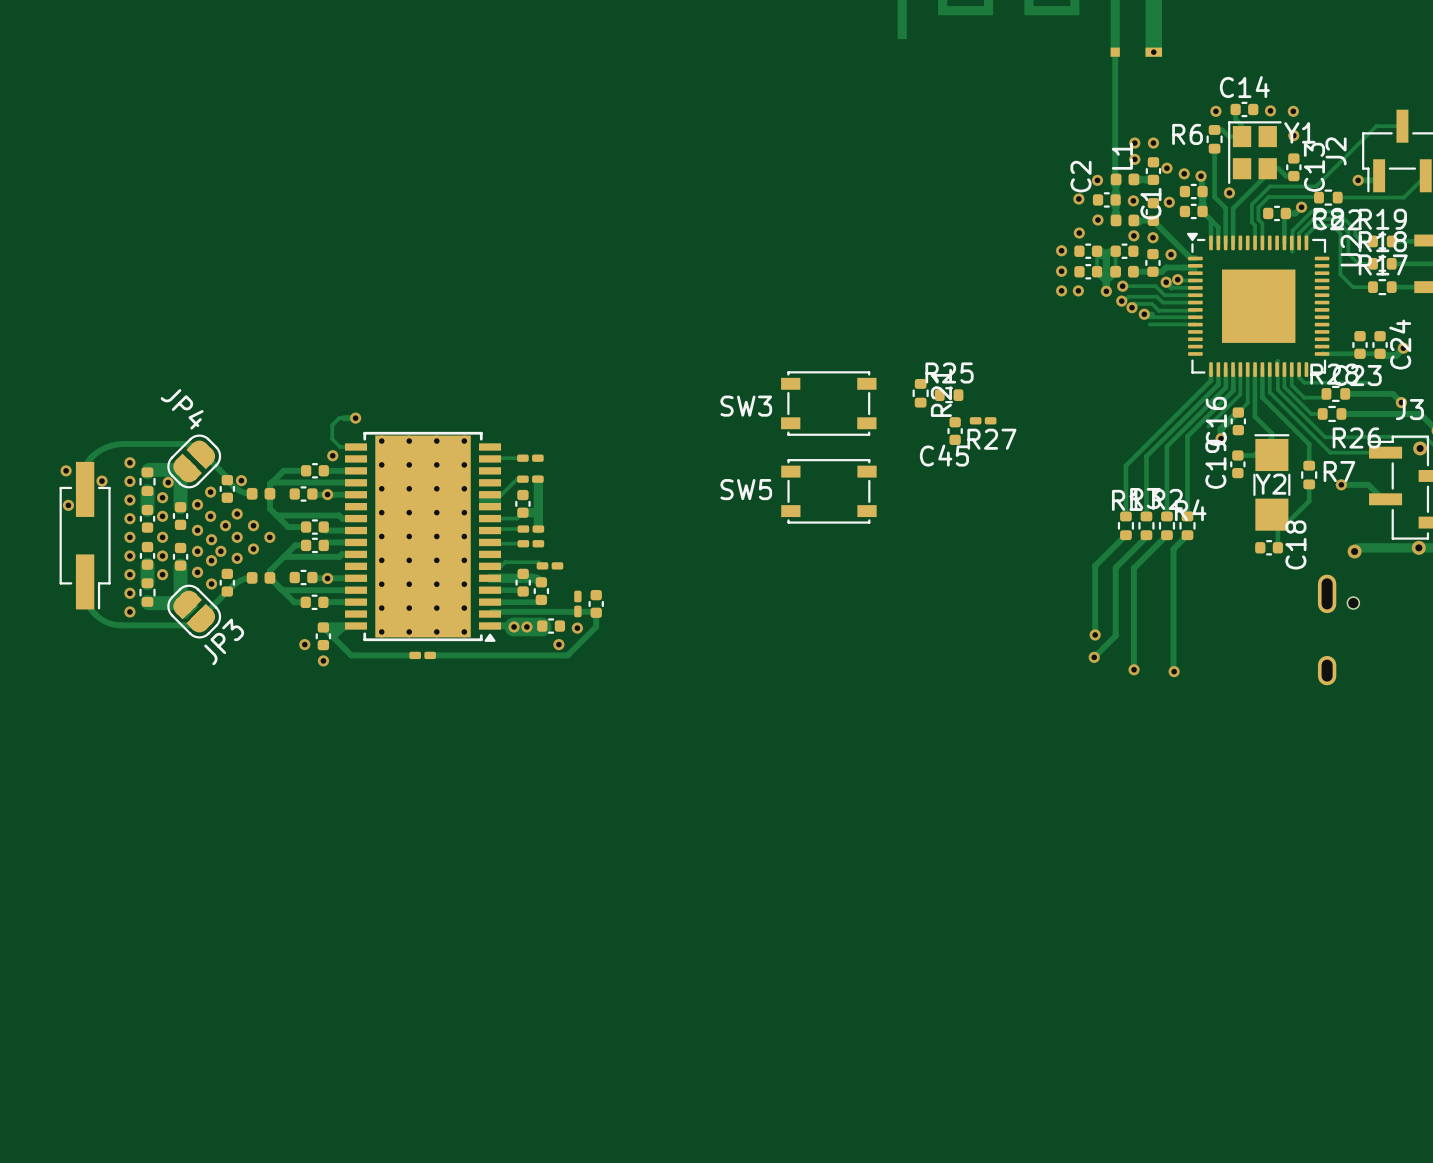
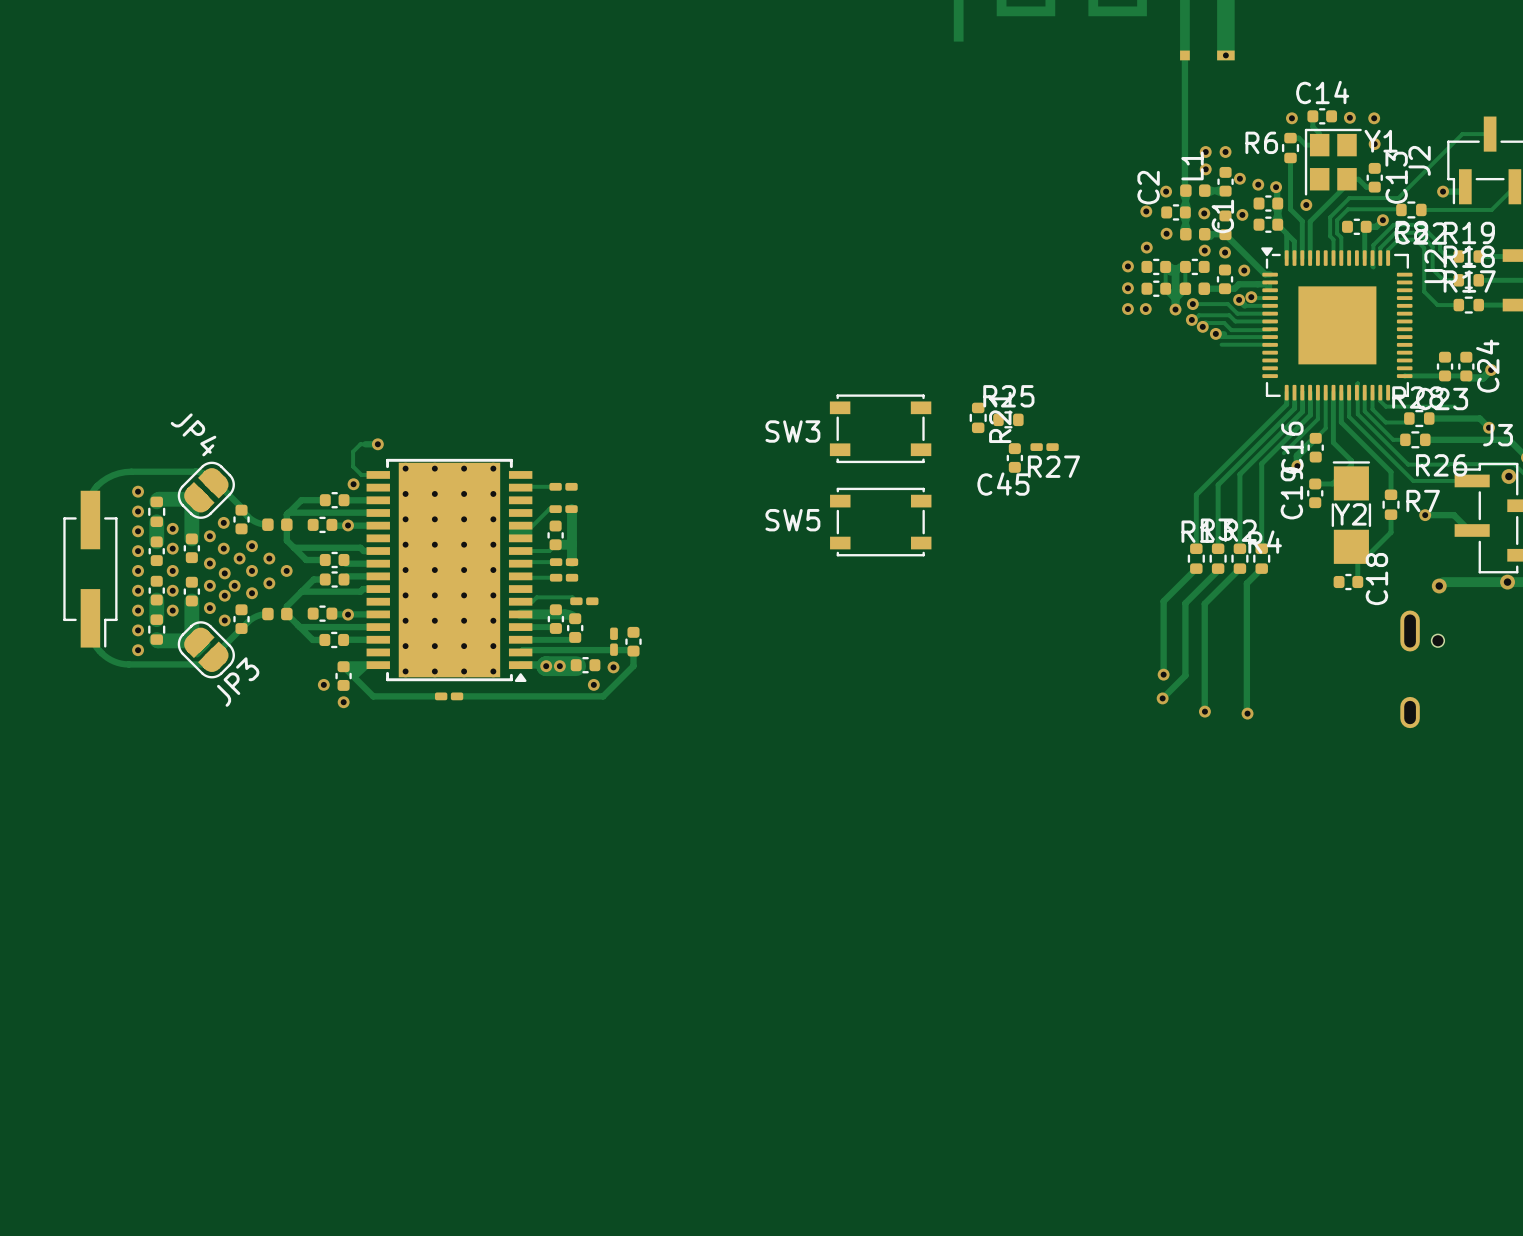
via: (66, 470) -> none
via: (241, 480) -> none
via: (102, 481) -> none
via: (168, 482) -> none
via: (68, 505) -> none

